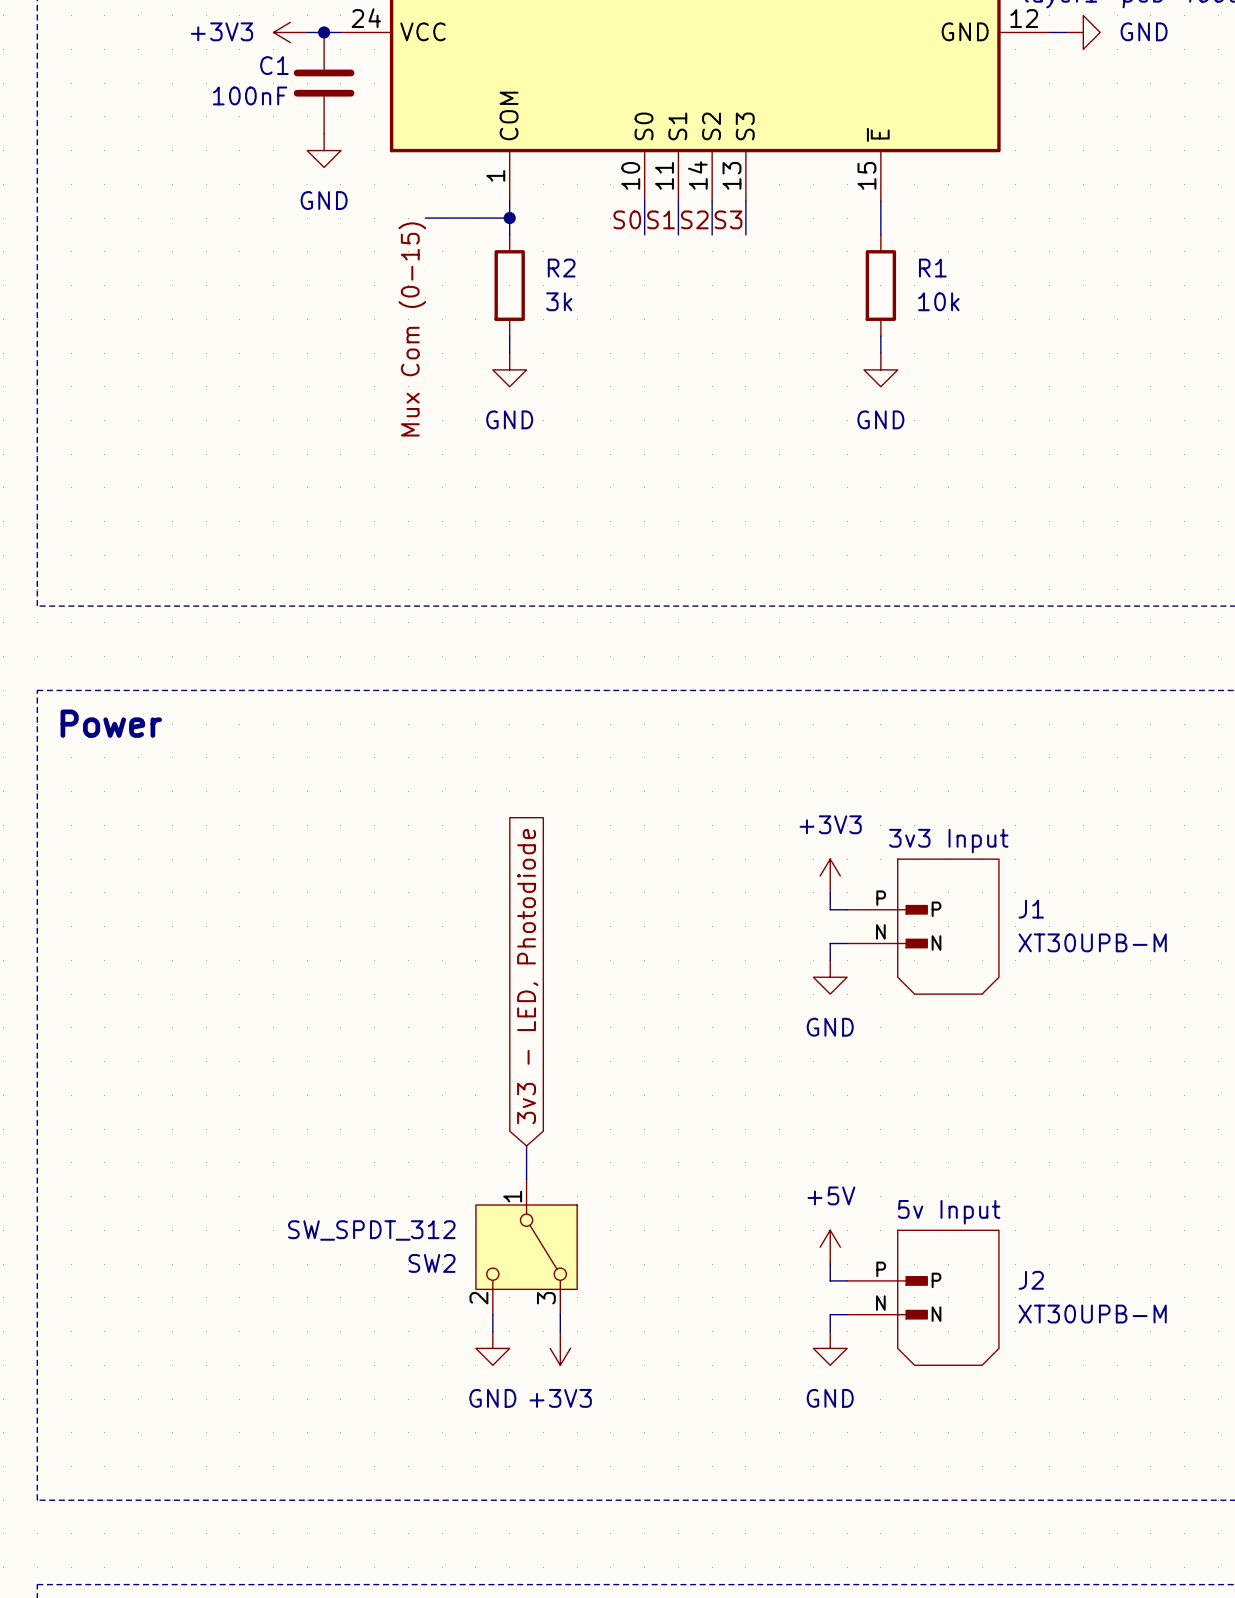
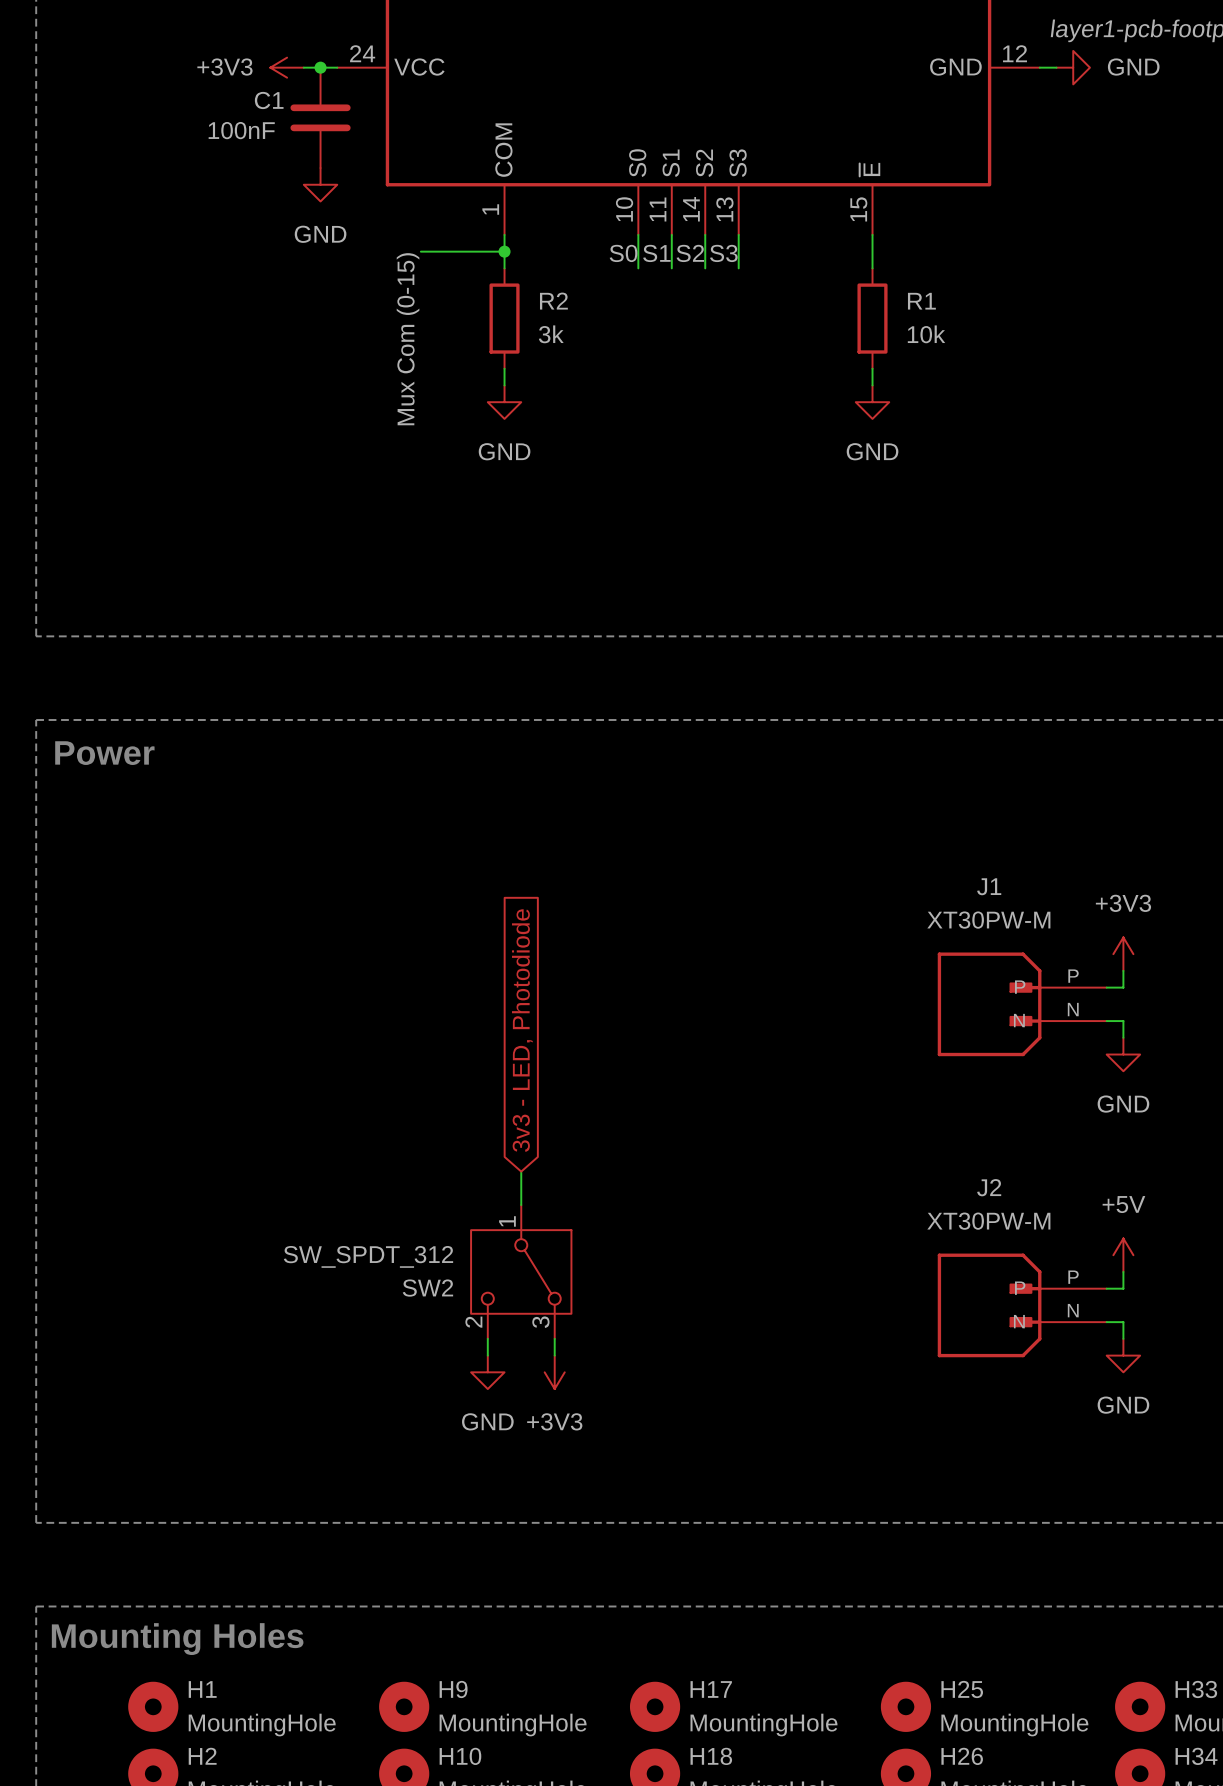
J1 text: 3v3 Input (948, 841) -> none
J1 symbol: [847, 859, 999, 995] -> [937, 952, 1107, 1057]
power symbol position: +3V3 (830, 876) -> +3V3 (1123, 954)
wire: (830, 892) (830, 909) (847, 909) -> none
J1 name position: J1 (1031, 909) -> J1 (989, 886)
J1 value: XT30UPB-M (1092, 942) -> XT30PW-M (988, 920)
wire: (847, 943) (830, 943) (830, 960) -> none
wire: none -> (1123, 970) (1123, 987) (1106, 987)
power symbol: GND (830, 977) -> none
wire: none -> (1106, 1021) (1123, 1021) (1123, 1037)
power symbol: none -> GND (1123, 1054)
J2 text: 5v Input (949, 1212) -> none
J2 symbol: [847, 1230, 999, 1366] -> [937, 1253, 1107, 1358]
power symbol position: +5V (830, 1247) -> +5V (1123, 1255)
wire: none -> (1123, 1271) (1123, 1288) (1106, 1288)
wire: (830, 1264) (830, 1280) (847, 1280) -> none
J2 name position: J2 (1031, 1280) -> J2 (989, 1187)
wire: none -> (1106, 1322) (1123, 1322) (1123, 1338)
wire: (847, 1314) (830, 1314) (830, 1331) -> none
J2 value: XT30UPB-M (1092, 1314) -> XT30PW-M (988, 1221)
power symbol: none -> GND (1123, 1355)
power symbol: GND (830, 1348) -> none

